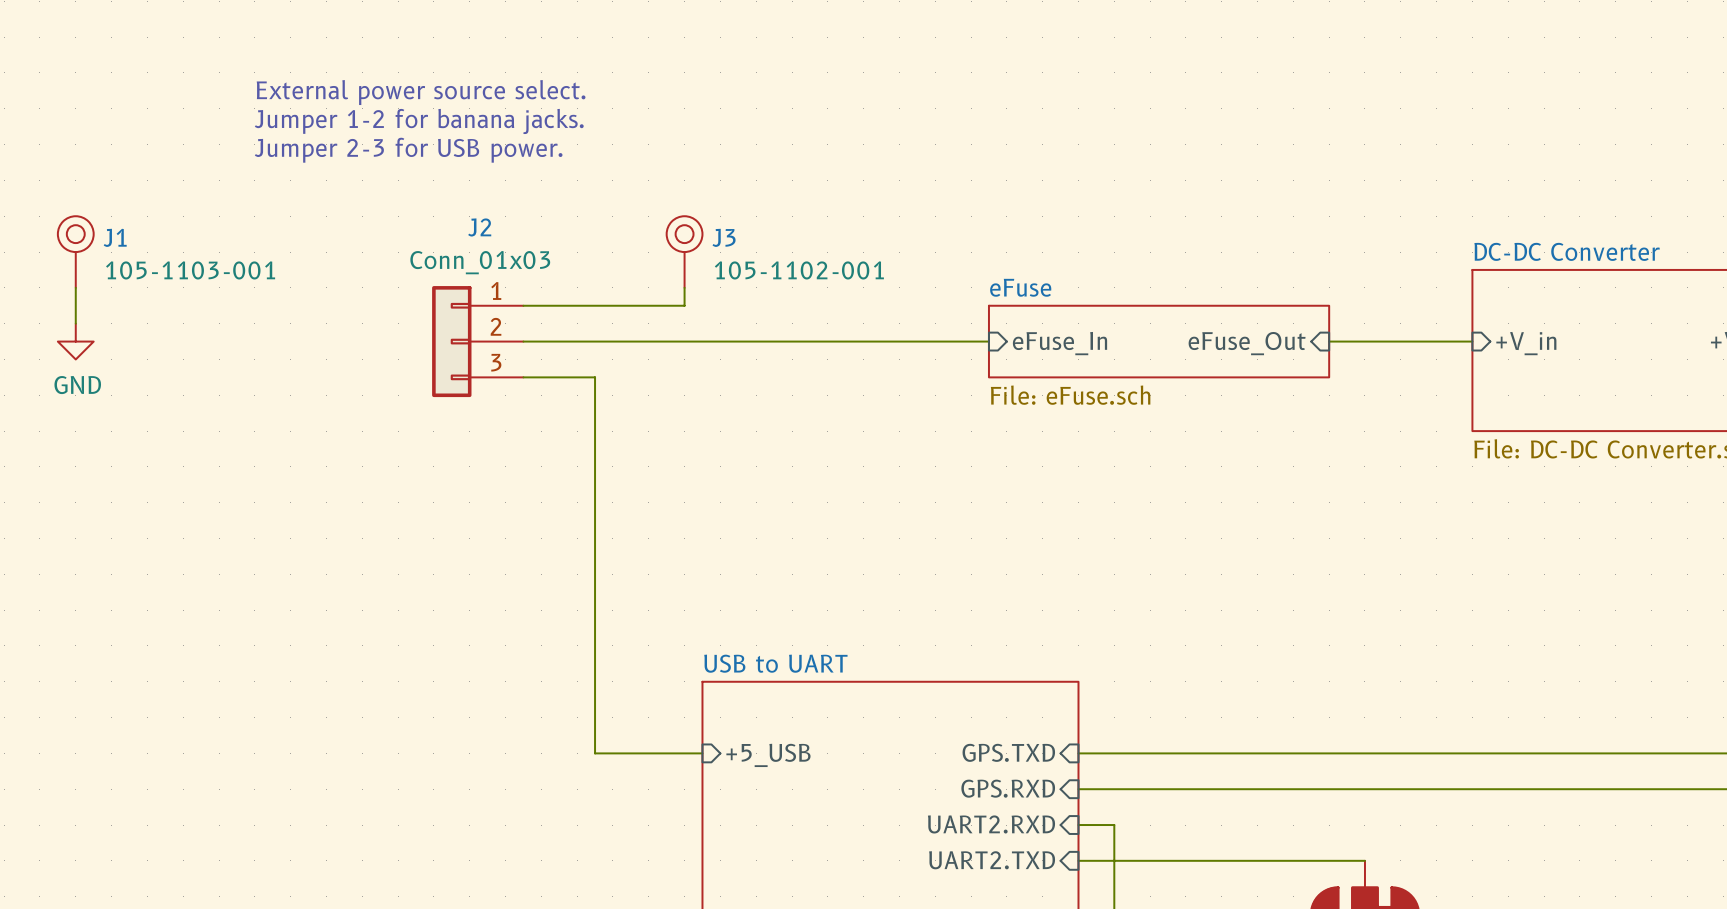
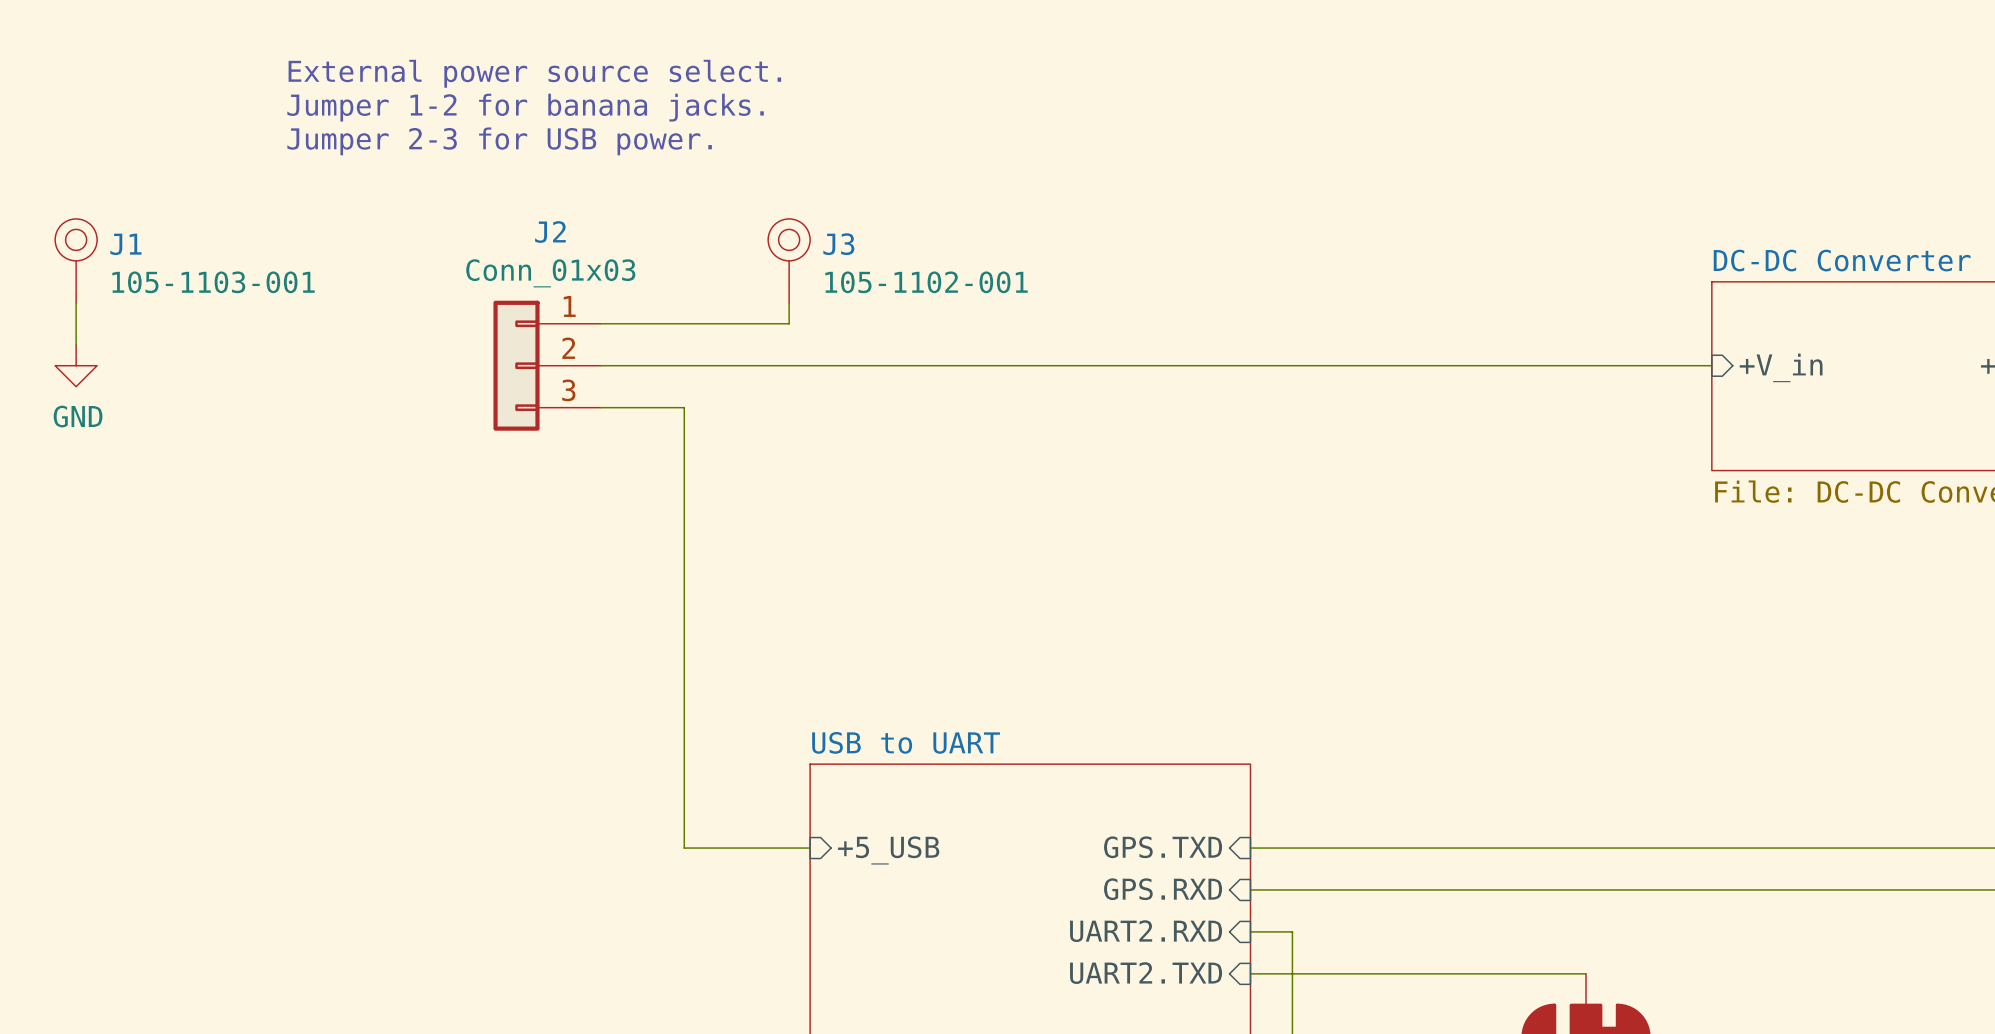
wire: none -> (1145, 365) (1544, 365)
sheet eFuse: File: eFuse.sch (1159, 341) -> none
sheet pin: eFuse_In (1060, 343) -> none
sheet pin: eFuse_Out (1247, 343) -> none

